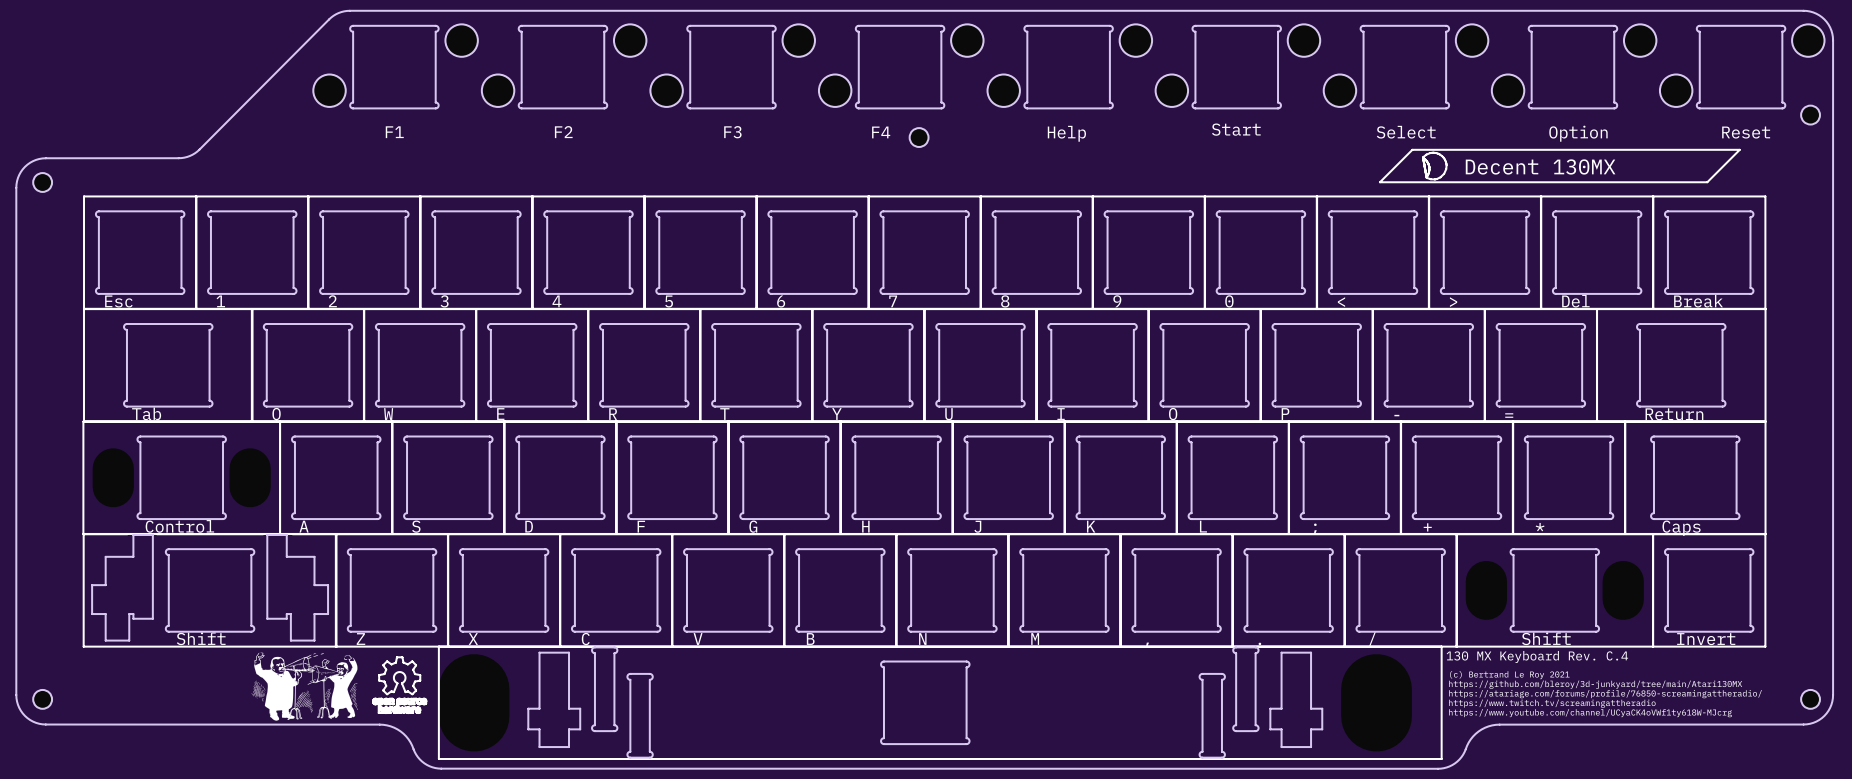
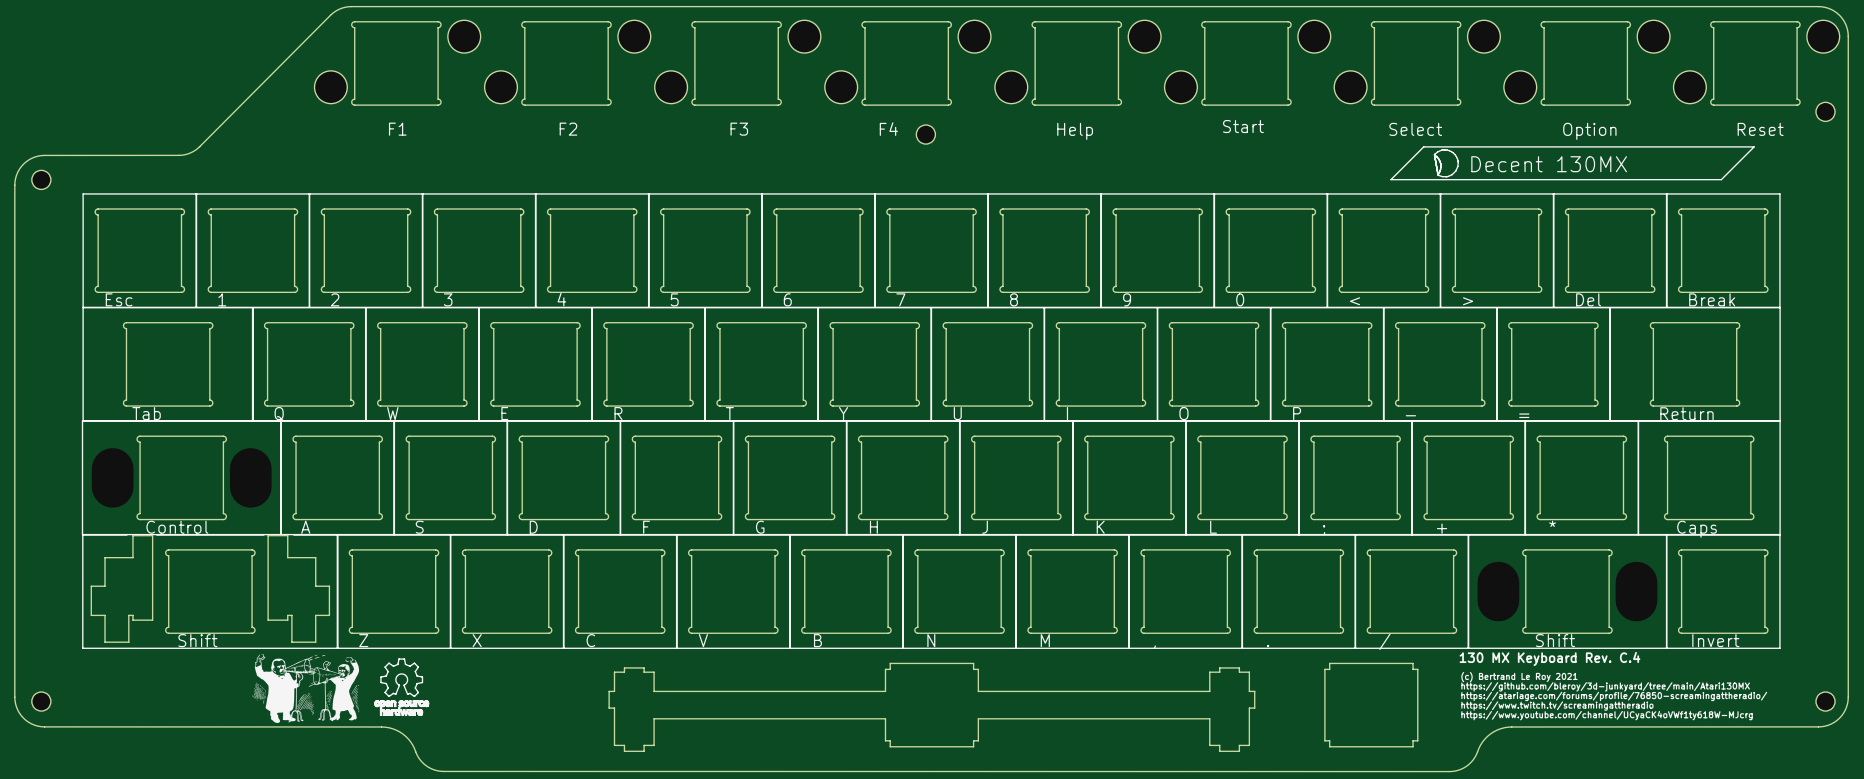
board edge: none -> (890, 663) (890, 669) (885, 669) (885, 691) (654, 691) (654, 672) (644, 672) (644, 667) (624, 667) (624, 672) (614, 672) (614, 691) (609, 691) (609, 708) (614, 708) (614, 745) (624, 745) (624, 751) (644, 751) (644, 745) (654, 745) (654, 718) (885, 718) (885, 740) (890, 740) (890, 746) (973, 746) (973, 740) (978, 740) (978, 718) (1209, 718) (1209, 745) (1219, 745) (1219, 751) (1239, 751) (1239, 745) (1249, 745) (1249, 708) (1254, 708) (1254, 691) (1249, 691) (1249, 672) (1239, 672) (1239, 667) (1219, 667) (1219, 672) (1209, 672) (1209, 691) (978, 691) (978, 669) (973, 669) (973, 663) (890, 663)
board edge: none -> (1329, 663) (1413, 663) (1413, 669) (1417, 669) (1417, 740) (1413, 740) (1413, 746) (1329, 746) (1329, 740) (1324, 740) (1324, 669) (1329, 669) (1329, 663)
part: (940, 702) -> none

